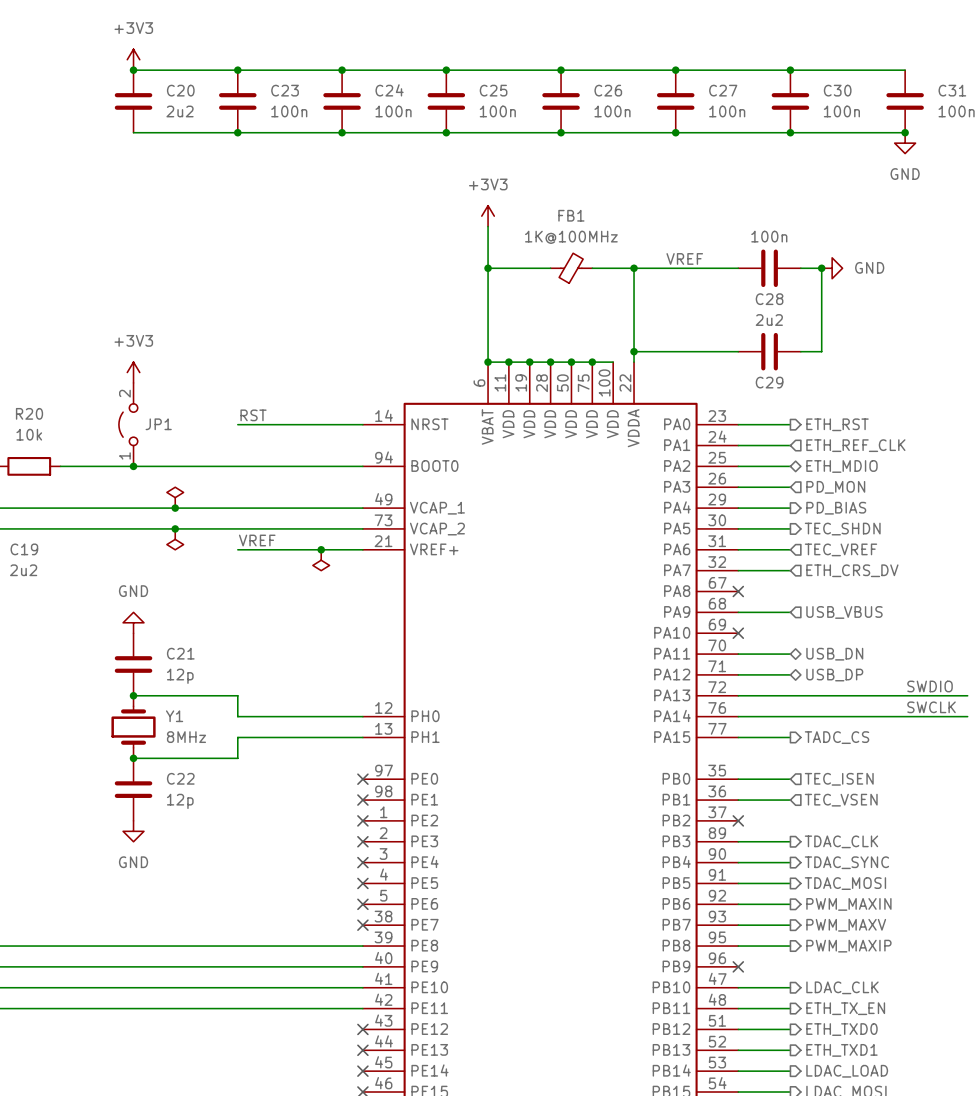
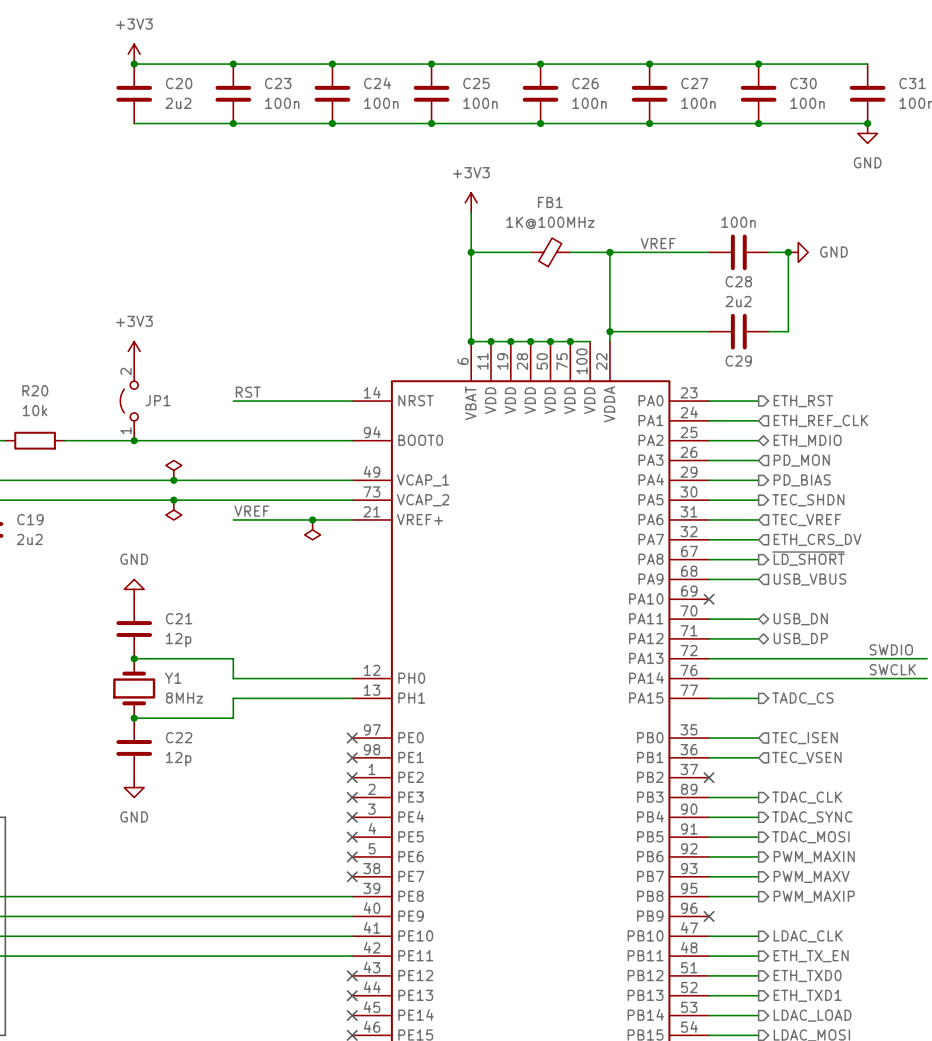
hierarchical label: none -> ~{LD_SHORT} (808, 558)
wire: none -> (709, 559) (758, 559)
no-connect mark: (738, 591) -> none

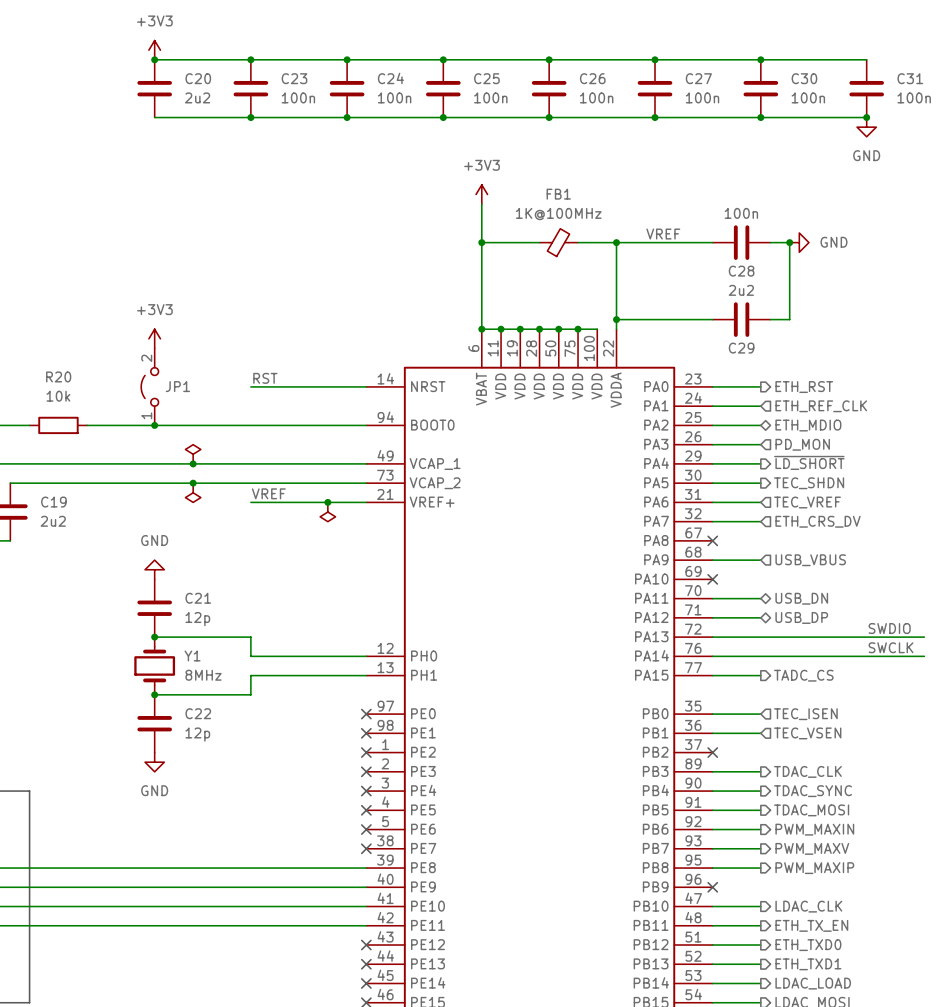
hierarchical label: PD_BIAS (802, 480) -> ~{LD_SHORT} (809, 462)
hierarchical label: ~{LD_SHORT} (808, 558) -> none
wire: (709, 559) (758, 559) -> none
no-connect mark: none -> (712, 540)

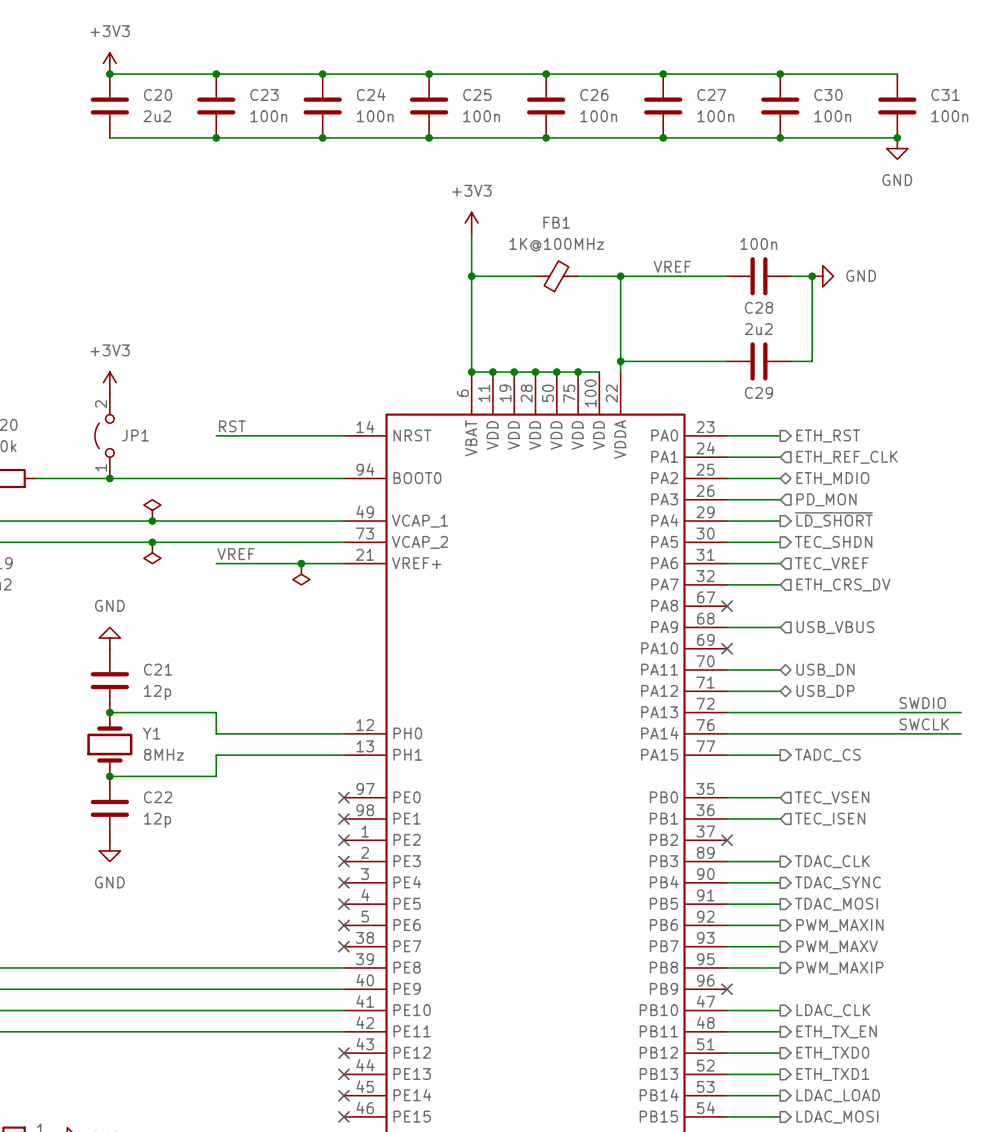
hierarchical label: TEC_ISEN (805, 714) -> TEC_VSEN (832, 797)
hierarchical label: TEC_VSEN (807, 733) -> TEC_ISEN (830, 819)

